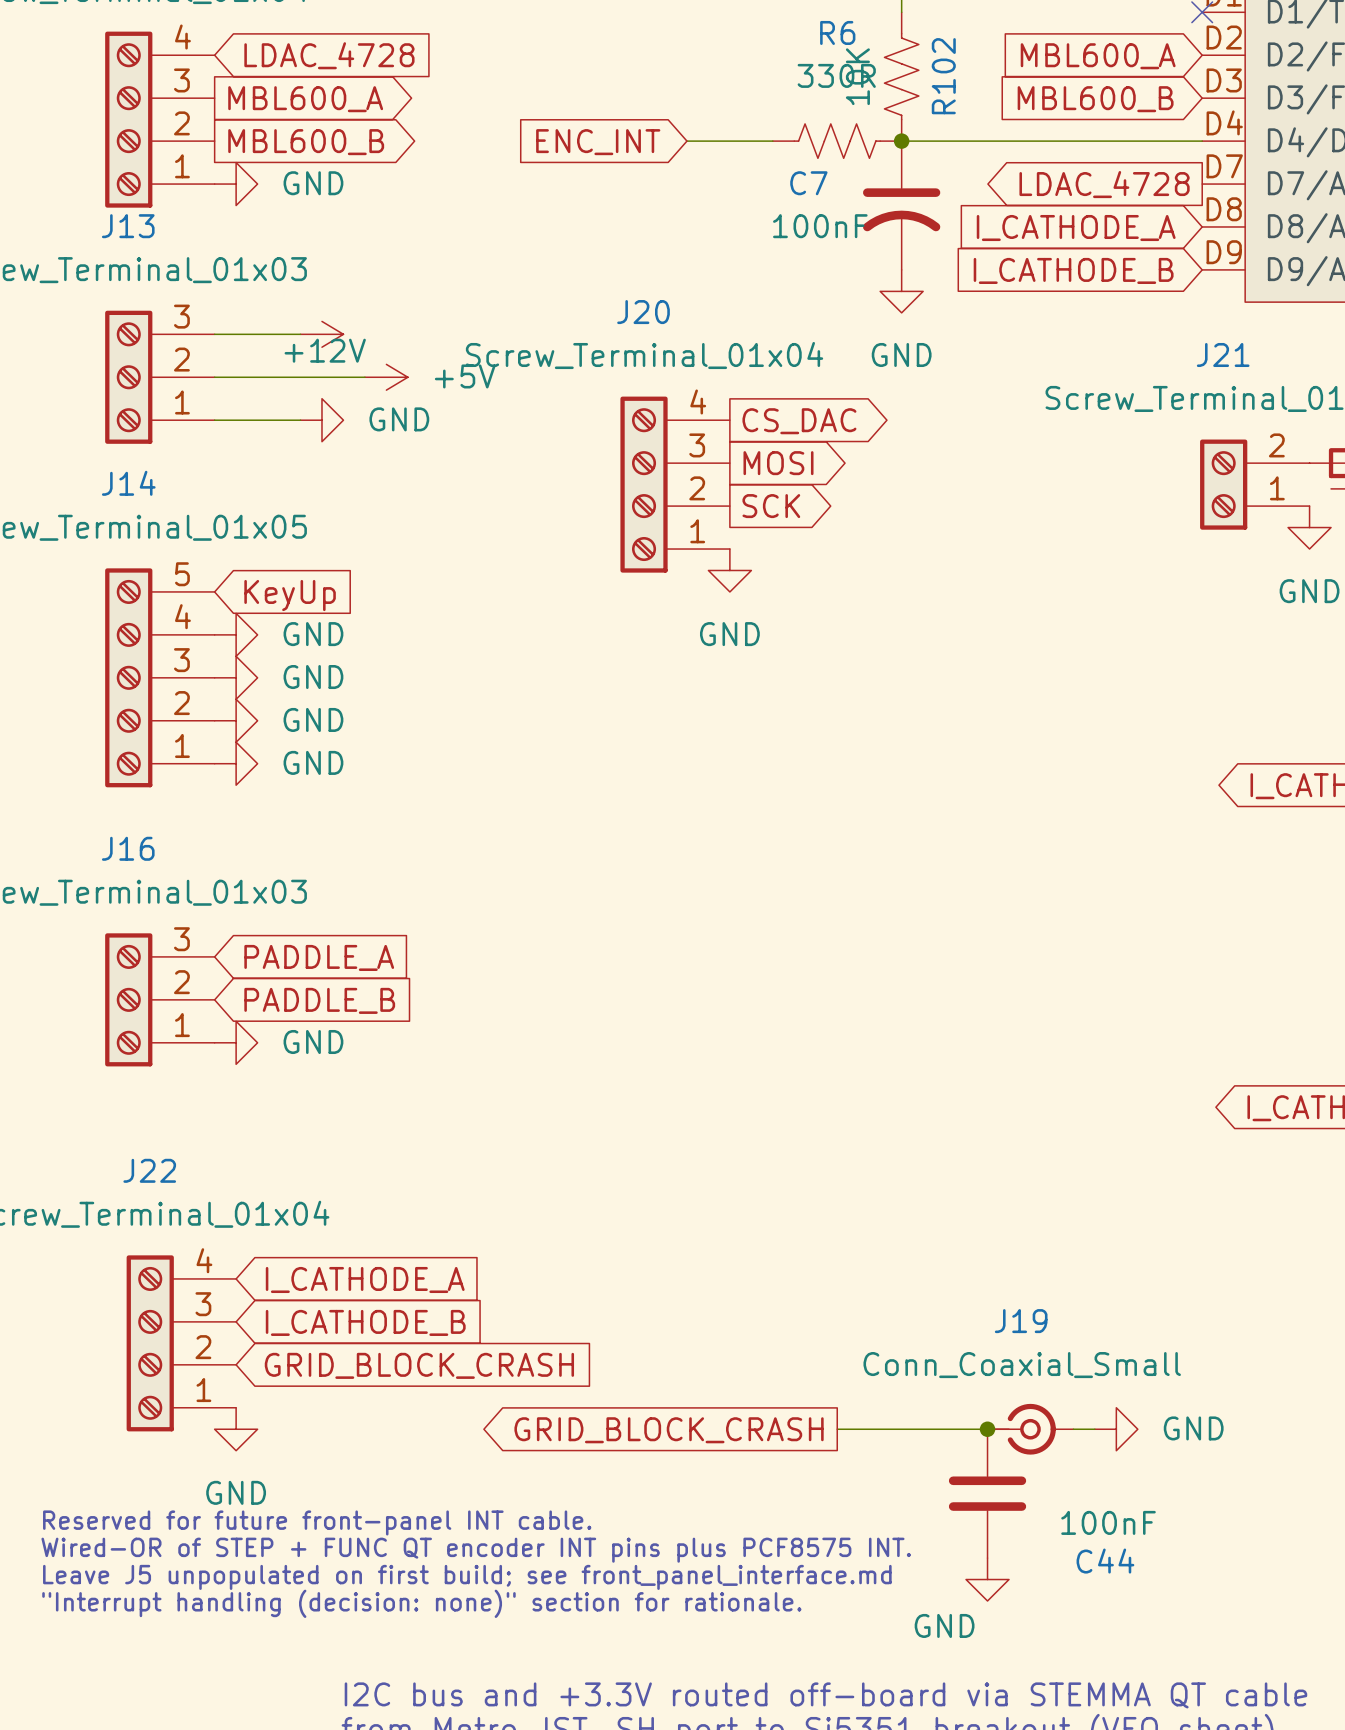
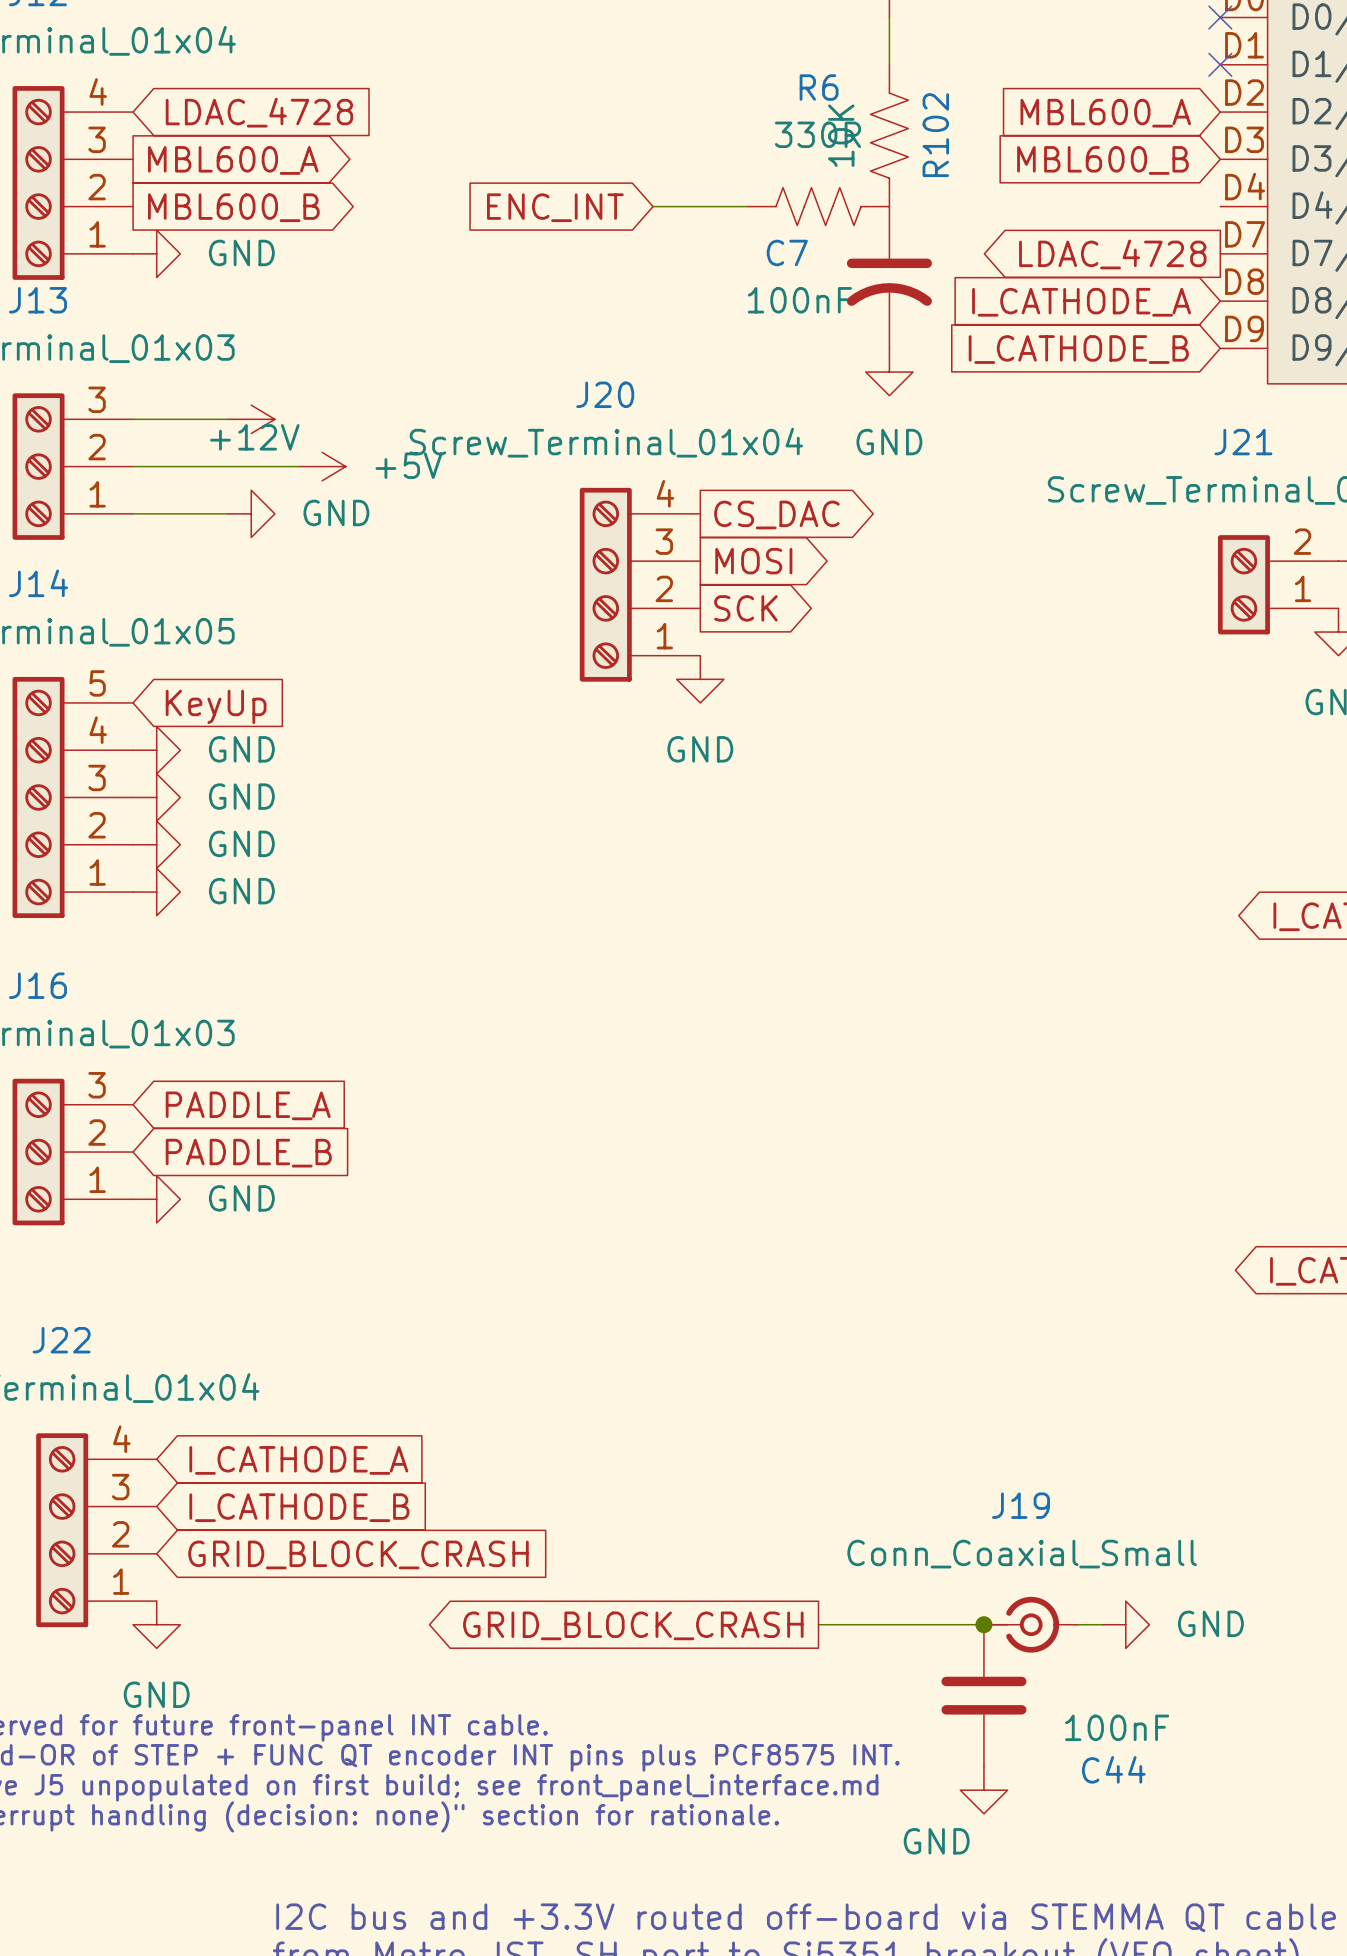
wire: (901, 141) (1202, 141) -> none
junction: (901, 141) -> none

